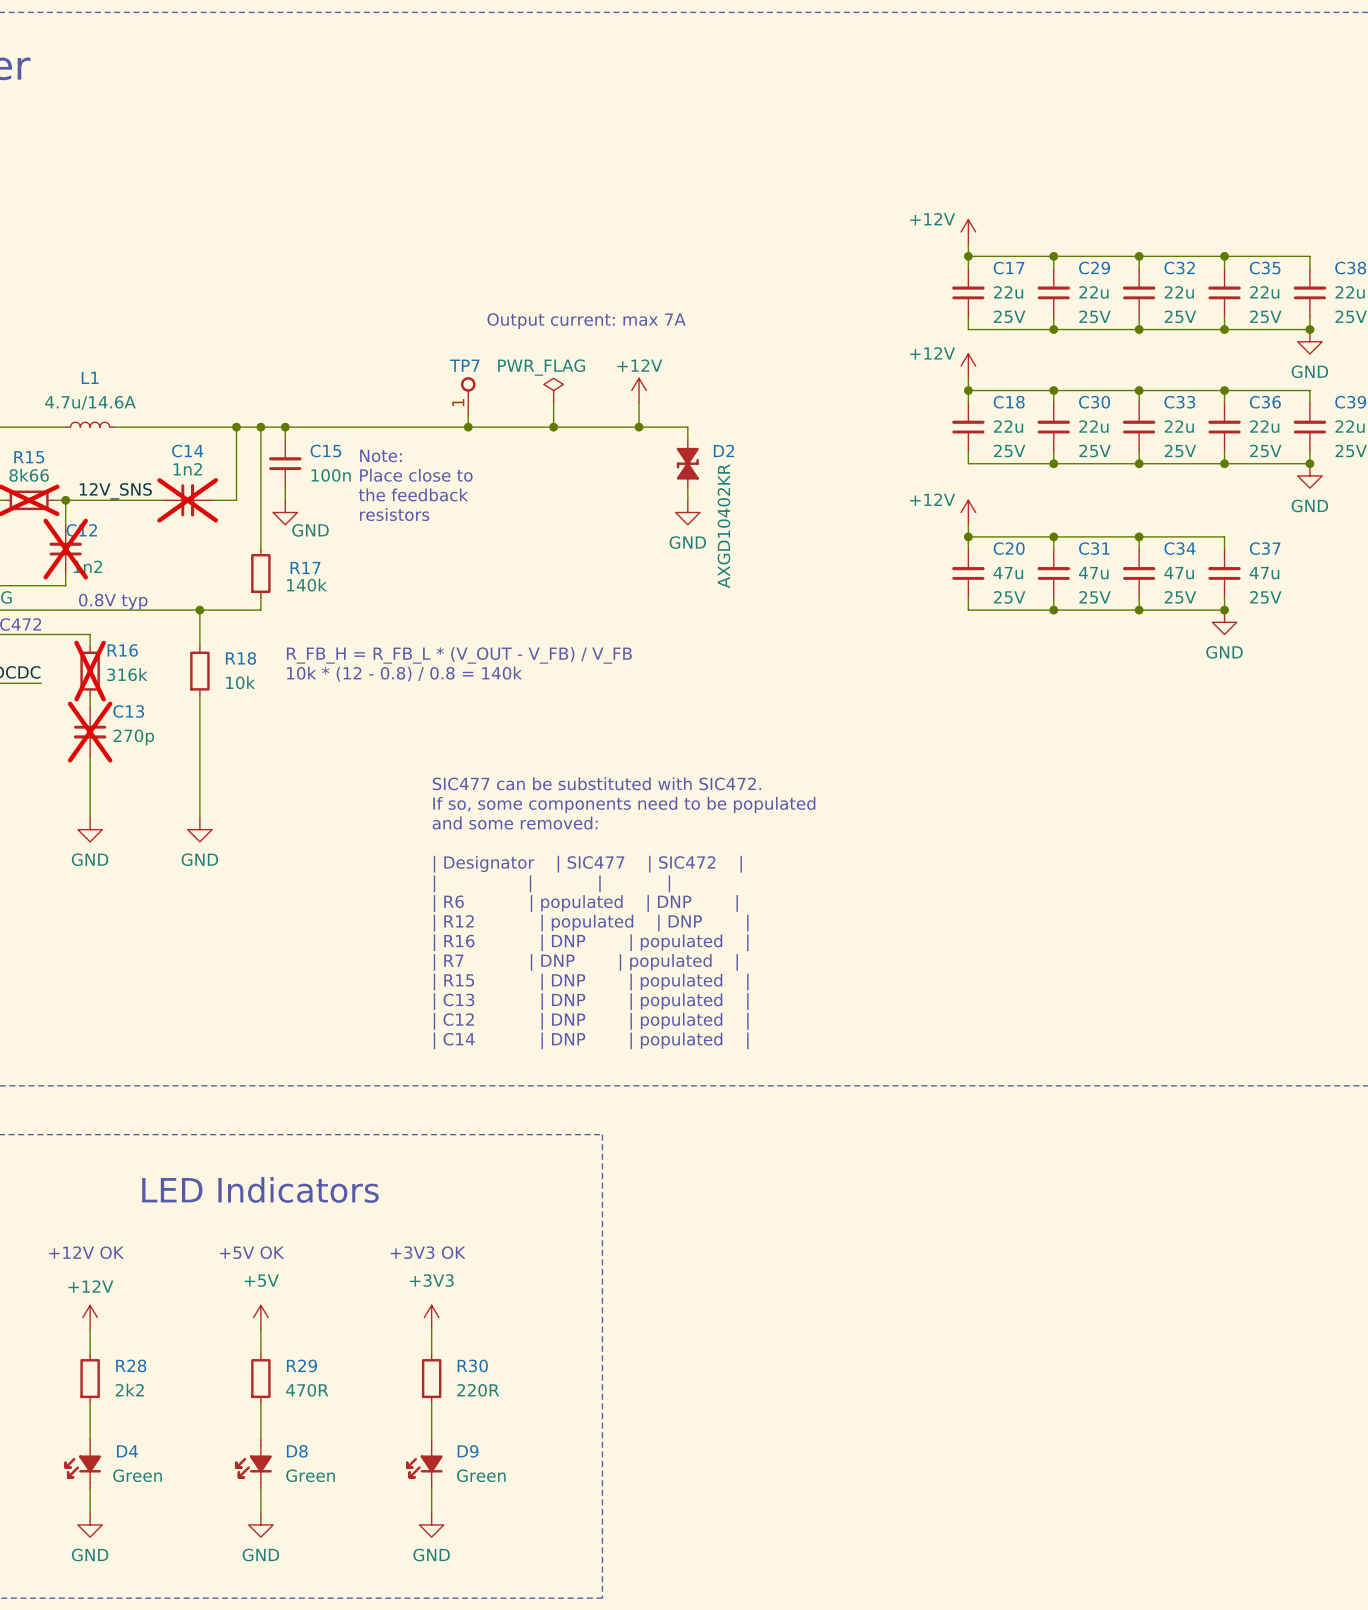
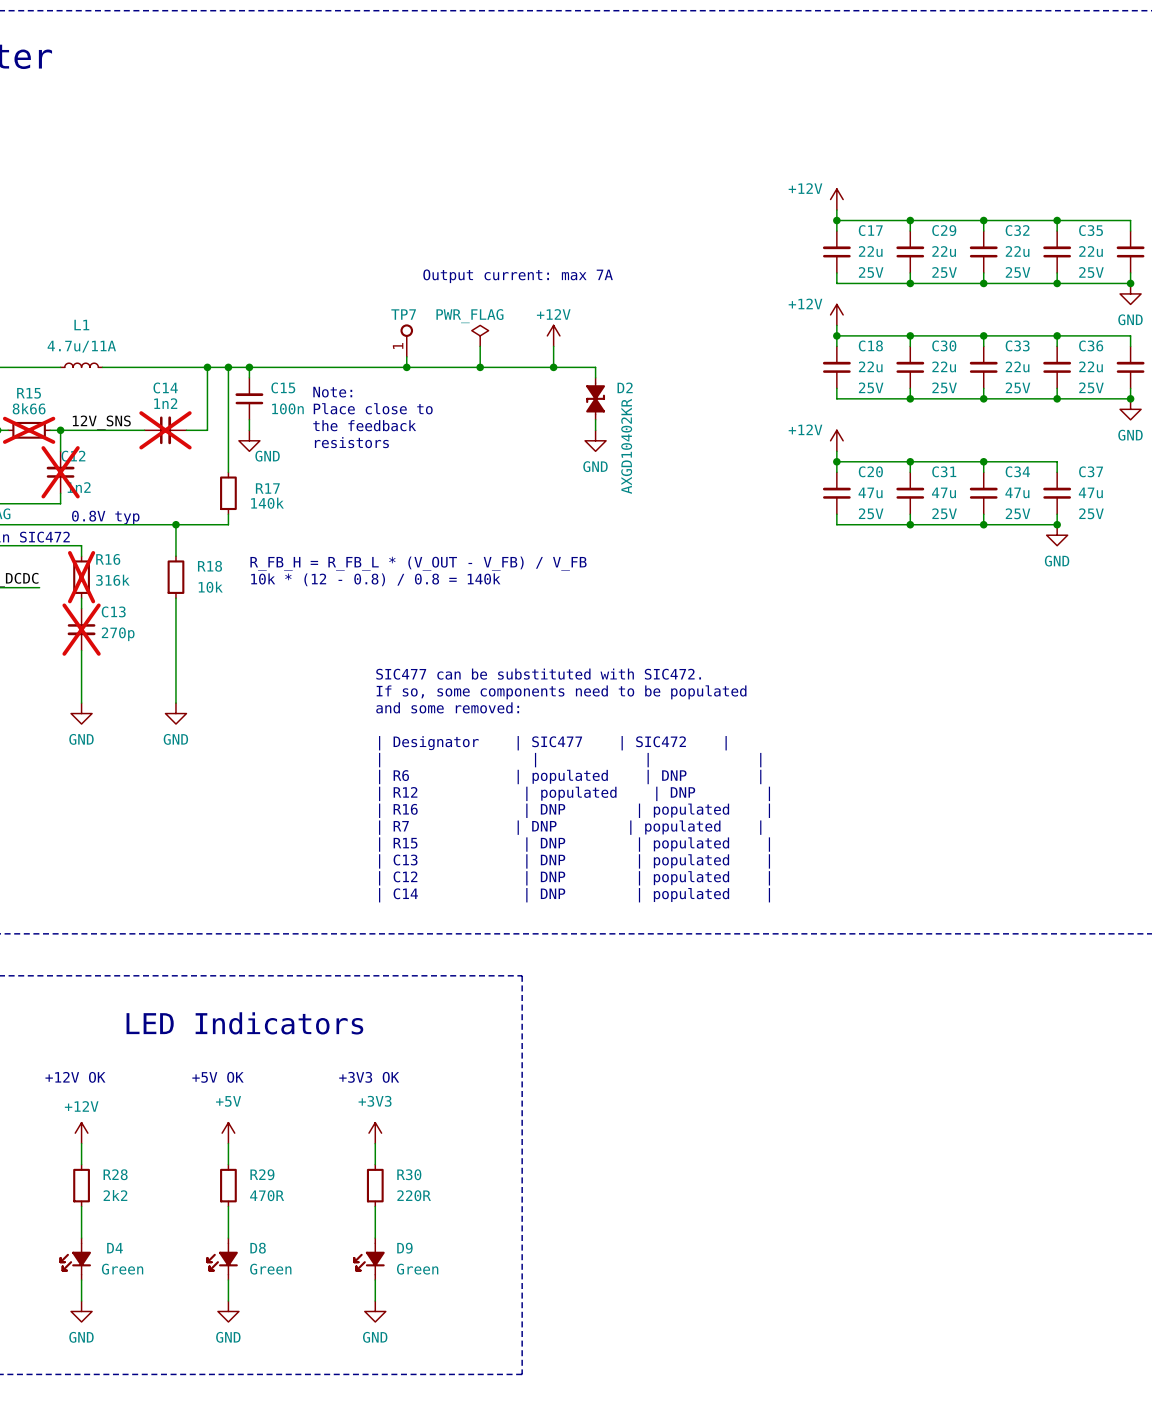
L1 text: 4.7u/14.6A (90, 402) -> 4.7u/11A (81, 346)

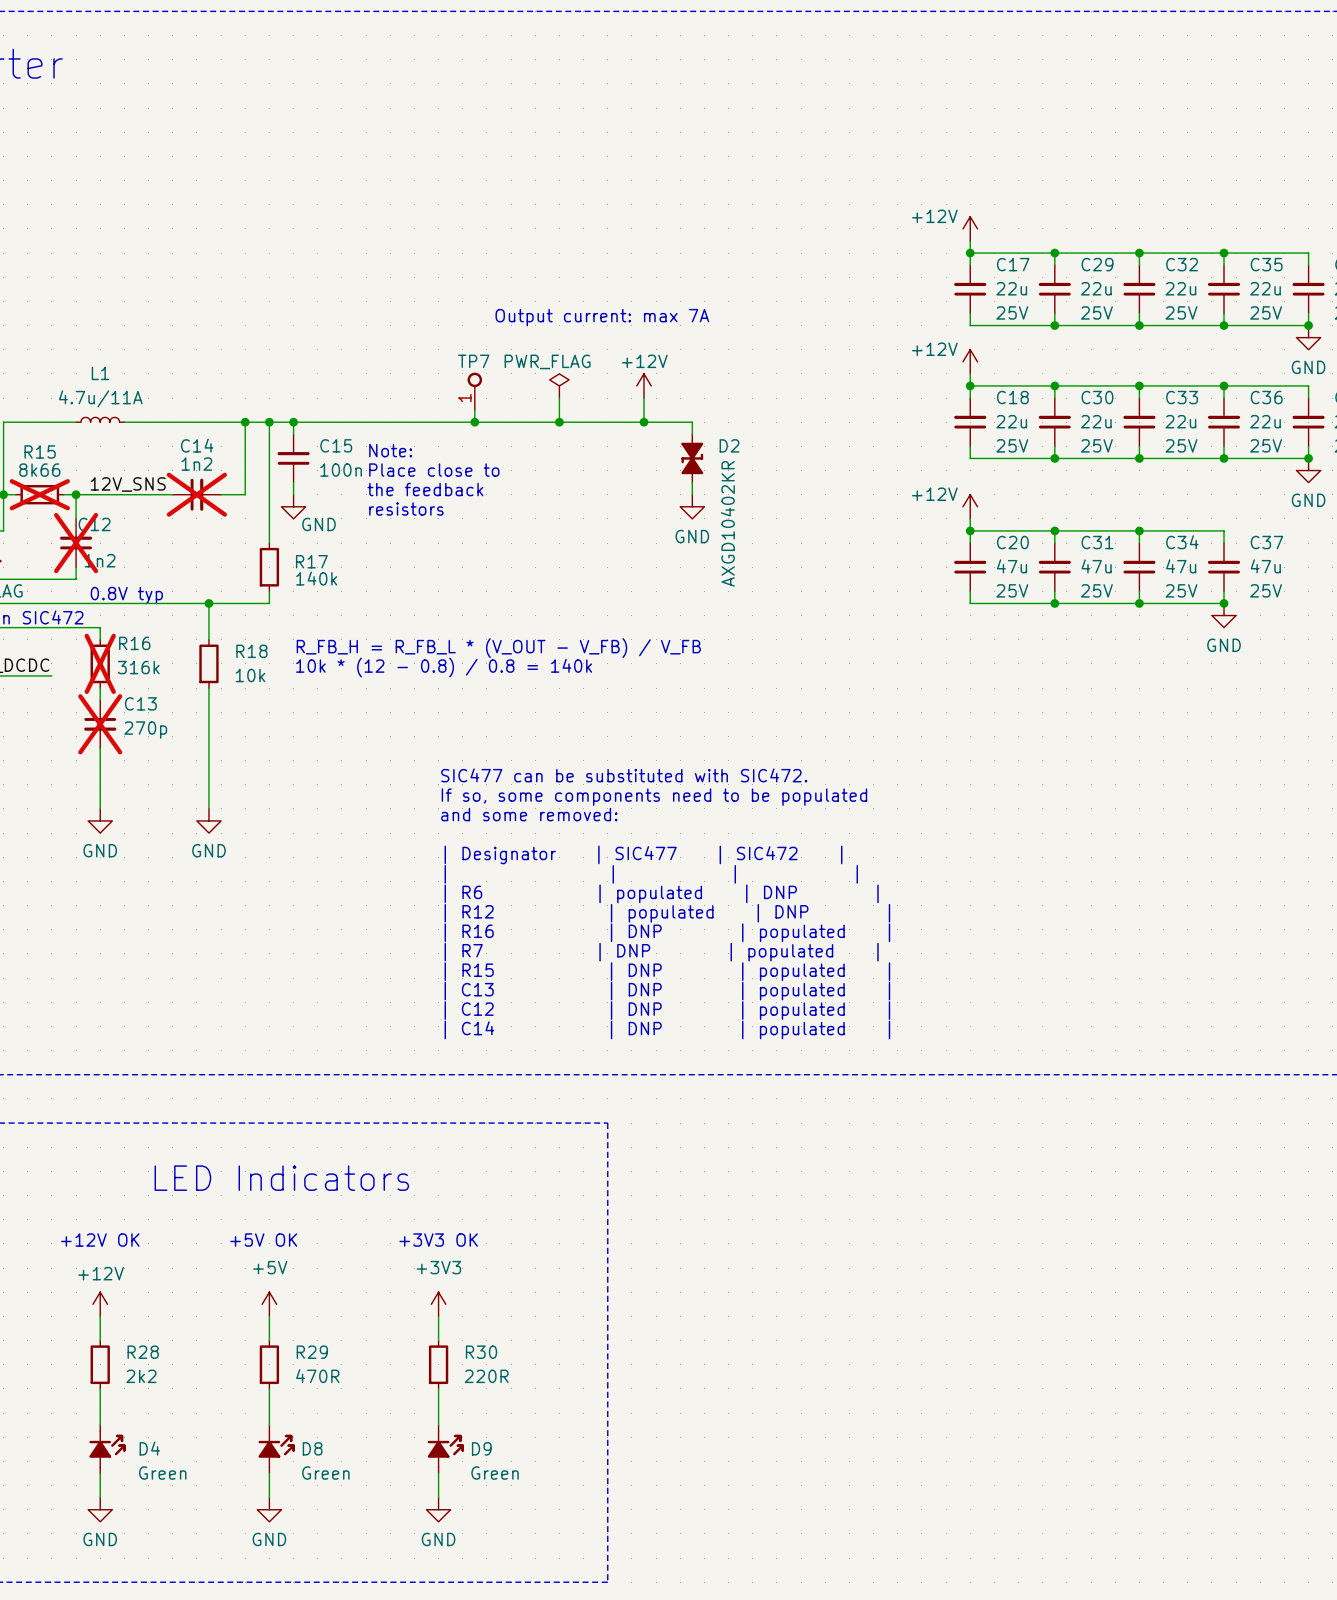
D4 rotation: 0° (75, 1259) -> 180° (107, 1449)
D8 rotation: 0° (222, 1259) -> 180° (276, 1449)
D9 rotation: 0° (369, 1259) -> 180° (445, 1449)

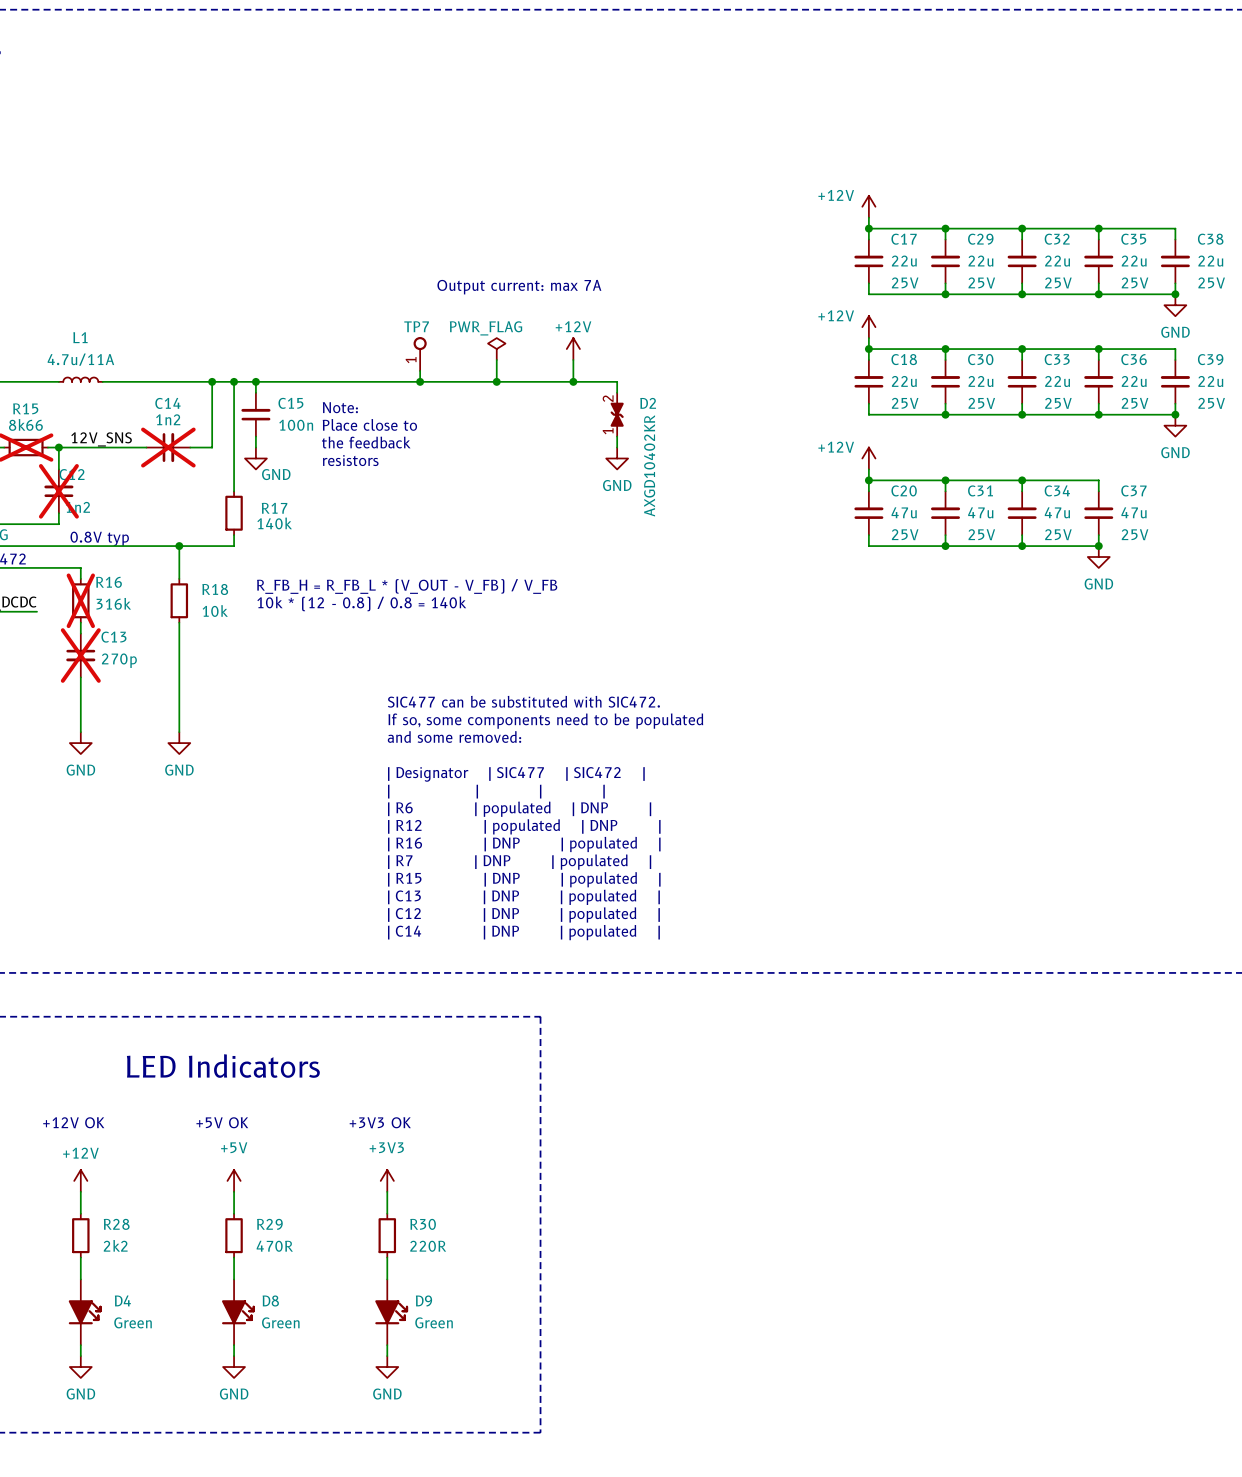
D2 symbol: [681, 434, 704, 483] -> [610, 392, 624, 437]
D4 symbol: [89, 1425, 126, 1474] -> [68, 1279, 102, 1346]
D8 symbol: [258, 1425, 295, 1474] -> [222, 1279, 255, 1346]
D9 symbol: [427, 1425, 464, 1474] -> [375, 1279, 409, 1346]

